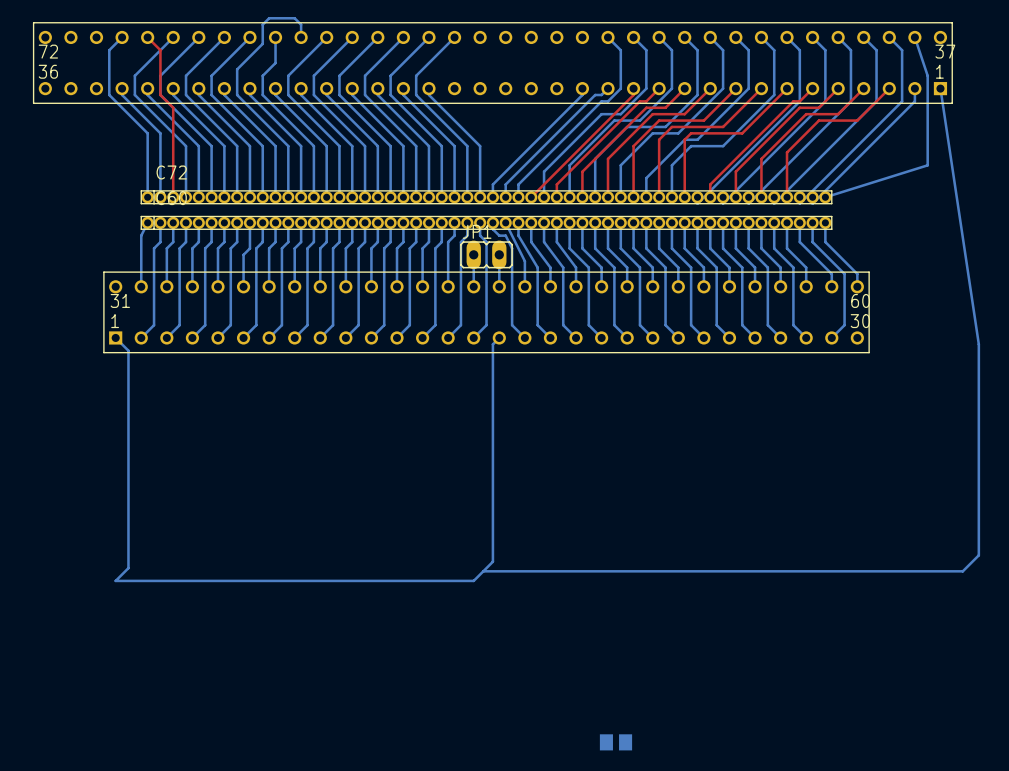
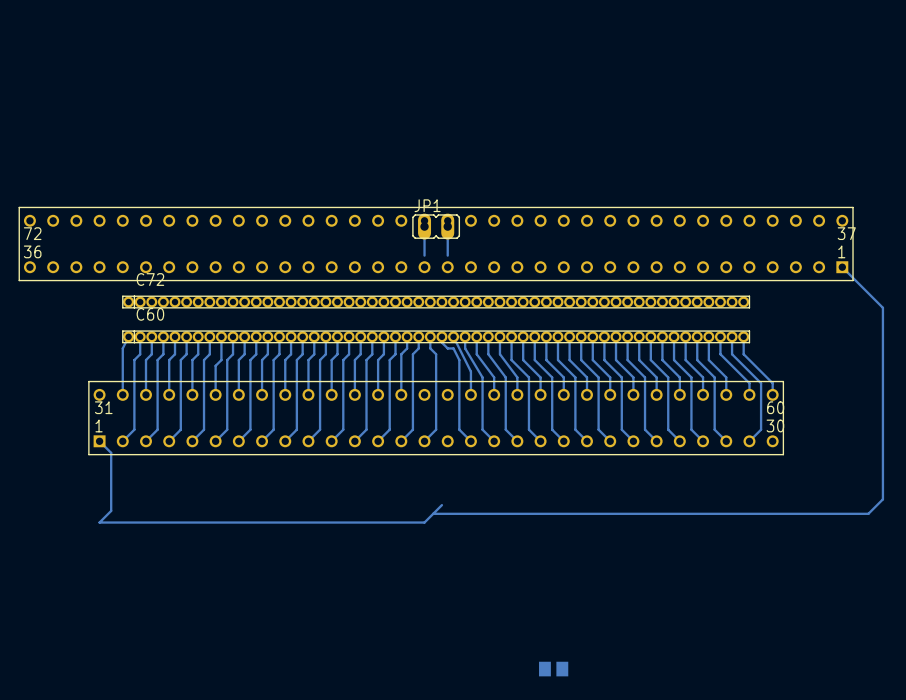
bottom track: (122, 37) (109, 50) (109, 95) (147, 133) (147, 197) -> none
top track: (147, 37) (160, 50) (160, 95) (173, 107) (173, 197) -> none
bottom track: (173, 37) (134, 75) (134, 95) (186, 146) (186, 197) -> none
bottom track: (198, 37) (160, 75) (160, 95) (211, 146) (211, 197) -> none
bottom track: (224, 37) (186, 75) (186, 95) (237, 146) (237, 197) -> none
bottom track: (249, 37) (211, 75) (211, 95) (262, 146) (262, 197) -> none
bottom track: (275, 37) (275, 63) (262, 75) (262, 95) (313, 146) (313, 197) -> none
bottom track: (301, 37) (301, 24) (294, 18) (269, 18) (262, 24) (262, 43) (237, 69) (237, 95) (288, 146) (288, 197) -> none
bottom track: (326, 37) (288, 75) (288, 95) (339, 146) (339, 197) -> none
bottom track: (352, 37) (313, 75) (313, 95) (365, 146) (365, 197) -> none
bottom track: (377, 37) (339, 75) (339, 95) (390, 146) (390, 197) -> none
bottom track: (403, 37) (365, 75) (365, 95) (416, 146) (416, 197) -> none
bottom track: (428, 37) (390, 75) (390, 95) (441, 146) (441, 197) -> none
bottom track: (454, 37) (416, 75) (416, 95) (467, 146) (467, 197) -> none
bottom track: (608, 37) (620, 50) (620, 88) (608, 101) (601, 101) (518, 184) (518, 197) -> none
bottom track: (633, 37) (646, 50) (646, 88) (620, 114) (601, 114) (544, 171) (544, 197) -> none
bottom track: (659, 37) (671, 50) (671, 88) (639, 120) (614, 120) (569, 165) (569, 197) -> none
bottom track: (684, 37) (697, 50) (697, 95) (665, 126) (627, 126) (595, 158) (595, 197) -> none
bottom track: (710, 37) (723, 50) (723, 88) (678, 133) (652, 133) (620, 165) (620, 197) -> none
bottom track: (735, 37) (748, 50) (748, 88) (697, 139) (684, 139) (646, 178) (646, 197) -> none
bottom track: (761, 37) (774, 50) (774, 95) (723, 146) (691, 146) (671, 165) (671, 197) -> none
bottom track: (787, 37) (799, 50) (799, 101) (697, 203) (697, 197) -> none
bottom track: (812, 37) (825, 50) (825, 101) (723, 203) (723, 197) -> none
bottom track: (838, 37) (850, 50) (850, 101) (748, 203) (748, 197) -> none
bottom track: (863, 37) (876, 50) (876, 101) (774, 203) (774, 197) -> none
bottom track: (889, 37) (902, 50) (902, 101) (799, 203) (799, 197) -> none
bottom track: (914, 37) (927, 75) (927, 165) (825, 197) -> none
part position: (492, 63) -> (436, 244)
bottom track: (122, 88) (122, 95) (160, 133) (160, 197) -> none
bottom track: (147, 88) (147, 95) (198, 146) (198, 197) -> none
bottom track: (173, 88) (173, 95) (224, 146) (224, 197) -> none
bottom track: (198, 88) (198, 95) (249, 146) (249, 197) -> none
bottom track: (224, 88) (224, 95) (275, 146) (275, 197) -> none
bottom track: (249, 88) (249, 95) (301, 146) (301, 197) -> none
bottom track: (275, 88) (275, 95) (326, 146) (326, 197) -> none
bottom track: (301, 88) (301, 95) (352, 146) (352, 197) -> none
bottom track: (326, 88) (326, 95) (377, 146) (377, 197) -> none
bottom track: (352, 88) (352, 95) (403, 146) (403, 197) -> none
bottom track: (377, 88) (377, 95) (428, 146) (428, 197) -> none
bottom track: (403, 88) (403, 95) (454, 146) (454, 197) -> none
bottom track: (428, 88) (428, 95) (480, 146) (480, 197) -> none
bottom track: (582, 88) (582, 95) (492, 184) (492, 197) -> none
bottom track: (608, 88) (601, 95) (595, 95) (505, 184) (505, 197) -> none
top track: (633, 88) (633, 95) (531, 197) -> none
top track: (659, 88) (646, 101) (639, 101) (556, 184) (556, 197) -> none
top track: (684, 88) (665, 107) (646, 107) (582, 171) (582, 197) -> none
top track: (710, 88) (684, 114) (652, 114) (608, 158) (608, 197) -> none
top track: (735, 88) (703, 120) (659, 120) (633, 146) (633, 197) -> none
top track: (761, 88) (723, 126) (671, 126) (659, 139) (659, 197) -> none
top track: (787, 88) (742, 133) (691, 133) (684, 139) (684, 197) -> none
top track: (812, 88) (799, 101) (793, 101) (710, 184) (710, 197) -> none
top track: (838, 88) (818, 107) (799, 107) (735, 171) (735, 197) -> none
top track: (863, 88) (838, 114) (806, 114) (761, 158) (761, 197) -> none
top track: (889, 88) (857, 120) (818, 120) (787, 152) (787, 197) -> none
bottom track: (914, 88) (914, 101) (812, 203) (812, 197) -> none
bottom track: (940, 88) (978, 344) -> (842, 267) (882, 307)
C72 position: (486, 197) -> (436, 302)
bottom track: (147, 222) (141, 235) (141, 286) -> (128, 336) (122, 348) (122, 394)
bottom track: (160, 222) (160, 242) (154, 248) (154, 325) (141, 337) -> (140, 336) (140, 354) (134, 360) (134, 429) (122, 441)
bottom track: (173, 222) (173, 242) (166, 248) (166, 286) -> (151, 336) (151, 354) (146, 360) (146, 394)
bottom track: (186, 222) (186, 242) (179, 248) (179, 325) (166, 337) -> (163, 336) (163, 354) (157, 360) (157, 429) (146, 441)
bottom track: (198, 222) (198, 242) (192, 248) (192, 286) -> (175, 336) (175, 354) (169, 360) (169, 394)
bottom track: (211, 222) (211, 242) (205, 248) (205, 325) (192, 337) -> (186, 336) (186, 354) (180, 360) (180, 429) (169, 441)
bottom track: (224, 222) (224, 242) (217, 248) (217, 286) -> (198, 336) (198, 354) (192, 360) (192, 394)
bottom track: (237, 222) (237, 242) (230, 248) (230, 325) (217, 337) -> (209, 336) (209, 354) (204, 360) (204, 429) (192, 441)
bottom track: (249, 222) (249, 248) (243, 254) (243, 286) -> (221, 336) (221, 360) (215, 365) (215, 394)
bottom track: (262, 222) (262, 242) (256, 248) (256, 325) (243, 337) -> (233, 336) (233, 354) (227, 360) (227, 429) (215, 441)
bottom track: (275, 222) (275, 242) (269, 248) (269, 286) -> (244, 336) (244, 354) (238, 360) (238, 394)
bottom track: (288, 222) (288, 242) (281, 248) (281, 325) (269, 337) -> (256, 336) (256, 354) (250, 360) (250, 429) (238, 441)
bottom track: (301, 222) (301, 242) (294, 248) (294, 286) -> (267, 336) (267, 354) (262, 360) (262, 394)
bottom track: (313, 222) (313, 242) (307, 248) (307, 325) (294, 337) -> (279, 336) (279, 354) (273, 360) (273, 429) (262, 441)
bottom track: (326, 222) (326, 242) (320, 248) (320, 286) -> (291, 336) (291, 354) (285, 360) (285, 394)
bottom track: (339, 222) (339, 242) (333, 248) (333, 325) (320, 337) -> (302, 336) (302, 354) (296, 360) (296, 429) (285, 441)
bottom track: (352, 222) (352, 242) (345, 248) (345, 286) -> (314, 336) (314, 354) (308, 360) (308, 394)
bottom track: (365, 222) (365, 242) (358, 248) (358, 325) (345, 337) -> (325, 336) (325, 354) (320, 360) (320, 429) (308, 441)
bottom track: (377, 222) (377, 242) (371, 248) (371, 286) -> (337, 336) (337, 354) (331, 360) (331, 394)
bottom track: (390, 222) (390, 242) (384, 248) (384, 325) (371, 337) -> (349, 336) (349, 354) (343, 360) (343, 429) (331, 441)
bottom track: (403, 222) (403, 242) (397, 248) (397, 286) -> (360, 336) (360, 354) (354, 360) (354, 394)
bottom track: (416, 222) (416, 242) (409, 248) (409, 325) (397, 337) -> (372, 336) (372, 354) (366, 360) (366, 429) (354, 441)
bottom track: (428, 222) (428, 242) (422, 248) (422, 286) -> (383, 336) (383, 354) (378, 360) (378, 394)
bottom track: (441, 222) (441, 242) (435, 248) (435, 325) (422, 337) -> (395, 336) (395, 354) (389, 360) (389, 429) (378, 441)
bottom track: (454, 222) (454, 235) (448, 242) (448, 286) -> (407, 336) (407, 348) (401, 354) (401, 394)
bottom track: (467, 222) (467, 235) (460, 242) (460, 325) (448, 337) -> (418, 336) (418, 348) (412, 354) (412, 429) (401, 441)
bottom track: (480, 222) (480, 235) (486, 242) (486, 325) (473, 337) -> (430, 336) (430, 348) (436, 354) (436, 429) (424, 441)
C60 position: (486, 222) -> (436, 336)
bottom track: (492, 222) (492, 229) (499, 235) (505, 235) (512, 248) (512, 325) (524, 337) -> none
bottom track: (505, 222) (524, 261) (524, 286) -> (453, 336) (470, 371) (470, 394)
bottom track: (518, 222) (518, 235) (537, 267) (537, 325) (550, 337) -> (465, 336) (465, 348) (482, 377) (482, 429) (494, 441)
bottom track: (531, 222) (531, 242) (550, 267) (550, 286) -> (476, 336) (476, 354) (494, 377) (494, 394)
bottom track: (544, 222) (544, 242) (563, 267) (563, 325) (576, 337) -> (488, 336) (488, 354) (505, 377) (505, 429) (517, 441)
bottom track: (556, 222) (556, 242) (576, 267) (576, 286) -> (499, 336) (499, 354) (517, 377) (517, 394)
bottom track: (569, 222) (569, 248) (588, 267) (588, 325) (601, 337) -> (511, 336) (511, 360) (528, 377) (528, 429) (540, 441)
bottom track: (582, 222) (582, 248) (601, 267) (601, 286) -> (523, 336) (523, 360) (540, 377) (540, 394)
bottom track: (595, 222) (595, 248) (614, 267) (614, 325) (627, 337) -> (534, 336) (534, 360) (552, 377) (552, 429) (563, 441)
bottom track: (608, 222) (608, 248) (627, 267) (627, 286) -> (546, 336) (546, 360) (563, 377) (563, 394)
bottom track: (620, 222) (620, 248) (639, 267) (639, 325) (652, 337) -> (557, 336) (557, 360) (575, 377) (575, 429) (587, 441)
bottom track: (633, 222) (633, 248) (652, 267) (652, 286) -> (569, 336) (569, 360) (587, 377) (587, 394)
bottom track: (646, 222) (646, 248) (665, 267) (665, 325) (678, 337) -> (581, 336) (581, 360) (598, 377) (598, 429) (610, 441)
bottom track: (659, 222) (659, 248) (678, 267) (678, 286) -> (592, 336) (592, 360) (610, 377) (610, 394)
bottom track: (671, 222) (671, 248) (691, 267) (691, 325) (703, 337) -> (604, 336) (604, 360) (621, 377) (621, 429) (633, 441)
bottom track: (684, 222) (684, 248) (703, 267) (703, 286) -> (616, 336) (616, 360) (633, 377) (633, 394)
bottom track: (697, 222) (697, 248) (716, 267) (716, 325) (729, 337) -> (627, 336) (627, 360) (645, 377) (645, 429) (656, 441)
bottom track: (710, 222) (710, 248) (729, 267) (729, 286) -> (639, 336) (639, 360) (656, 377) (656, 394)
bottom track: (723, 222) (723, 248) (742, 267) (742, 325) (755, 337) -> (650, 336) (650, 360) (668, 377) (668, 429) (679, 441)
bottom track: (735, 222) (735, 248) (755, 267) (755, 286) -> (662, 336) (662, 360) (679, 377) (679, 394)
bottom track: (748, 222) (748, 248) (767, 267) (767, 325) (780, 337) -> (674, 336) (674, 360) (691, 377) (691, 429) (703, 441)
bottom track: (761, 222) (761, 248) (780, 267) (780, 286) -> (685, 336) (685, 360) (703, 377) (703, 394)
bottom track: (774, 222) (774, 248) (793, 267) (793, 325) (806, 337) -> (697, 336) (697, 360) (714, 377) (714, 429) (726, 441)
bottom track: (787, 222) (787, 248) (806, 267) (806, 286) -> (708, 336) (708, 360) (726, 377) (726, 394)
bottom track: (799, 222) (799, 242) (831, 274) (831, 286) -> (720, 336) (720, 354) (749, 383) (749, 394)
bottom track: (812, 222) (812, 242) (844, 274) (844, 325) (831, 337) -> (732, 336) (732, 354) (761, 383) (761, 429) (749, 441)
bottom track: (825, 222) (825, 242) (857, 274) (857, 286) -> (743, 336) (743, 354) (772, 383) (772, 394)
part position: (486, 312) -> (436, 418)
bottom track: (115, 337) (128, 350) (128, 504) -> (99, 441) (111, 452)
bottom track: (499, 337) (492, 344) (492, 376) -> none
bottom track: (492, 382) (492, 561) -> (441, 342) (447, 348) (453, 348) (459, 360) (459, 429) (470, 441)

